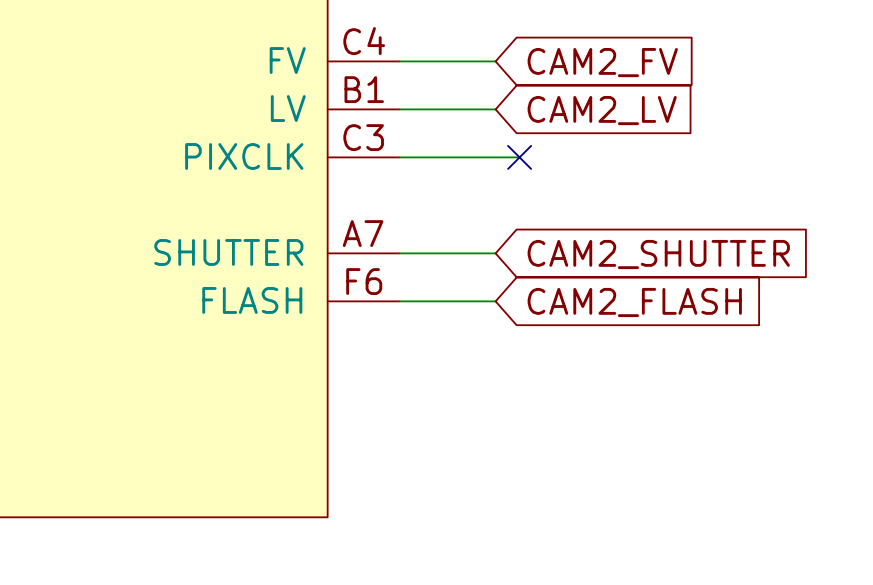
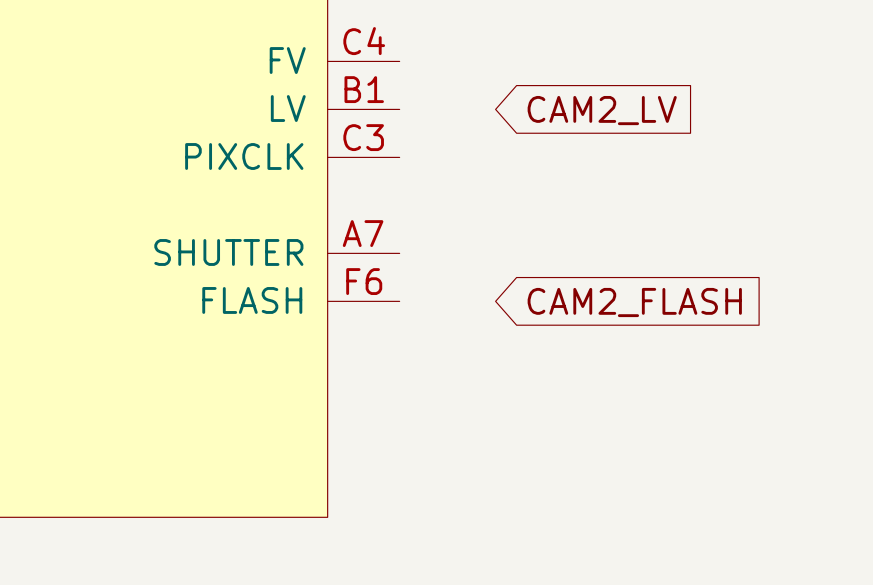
wire: (399, 61) (495, 61) -> none
global label: CAM2_FV (602, 62) -> none
wire: (399, 109) (495, 109) -> none
wire: (399, 157) (519, 157) -> none
no-connect mark: (519, 157) -> none
wire: (399, 253) (495, 253) -> none
global label: CAM2_SHUTTER (658, 254) -> none
wire: (399, 301) (495, 301) -> none

